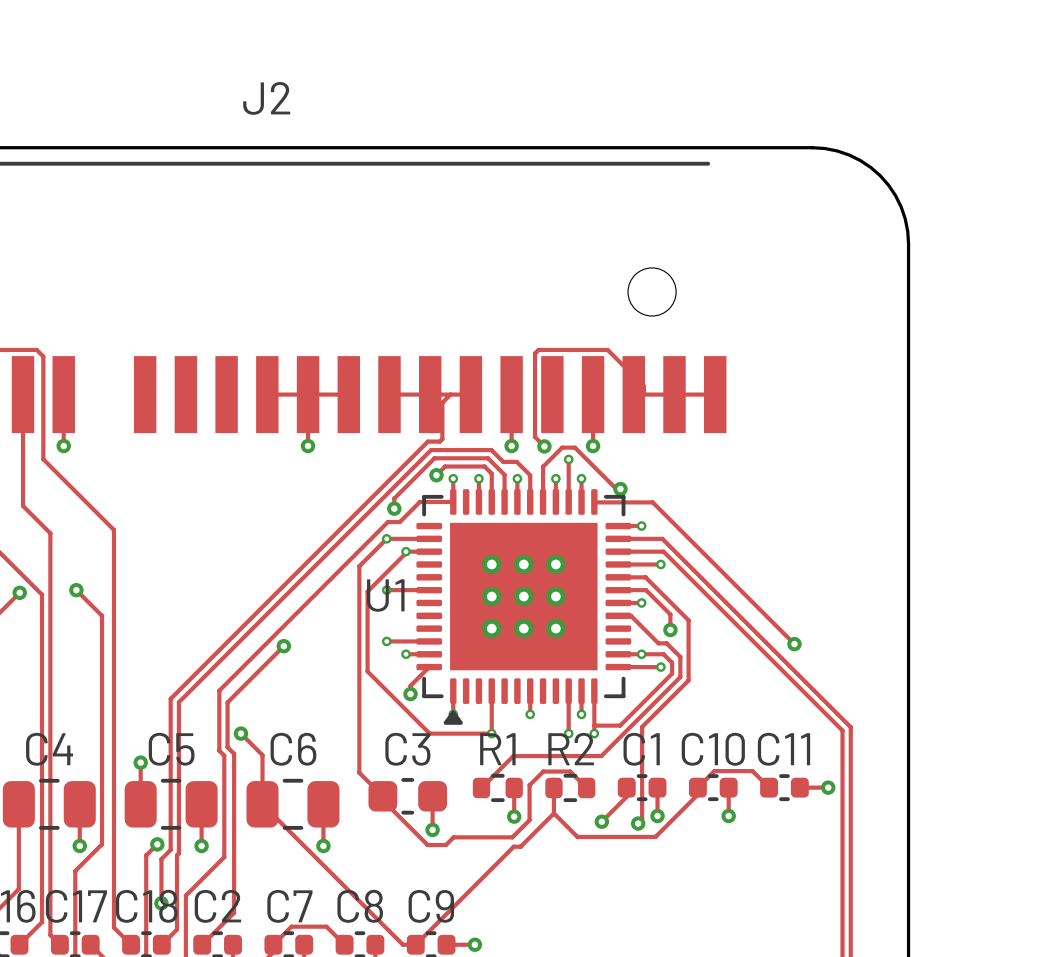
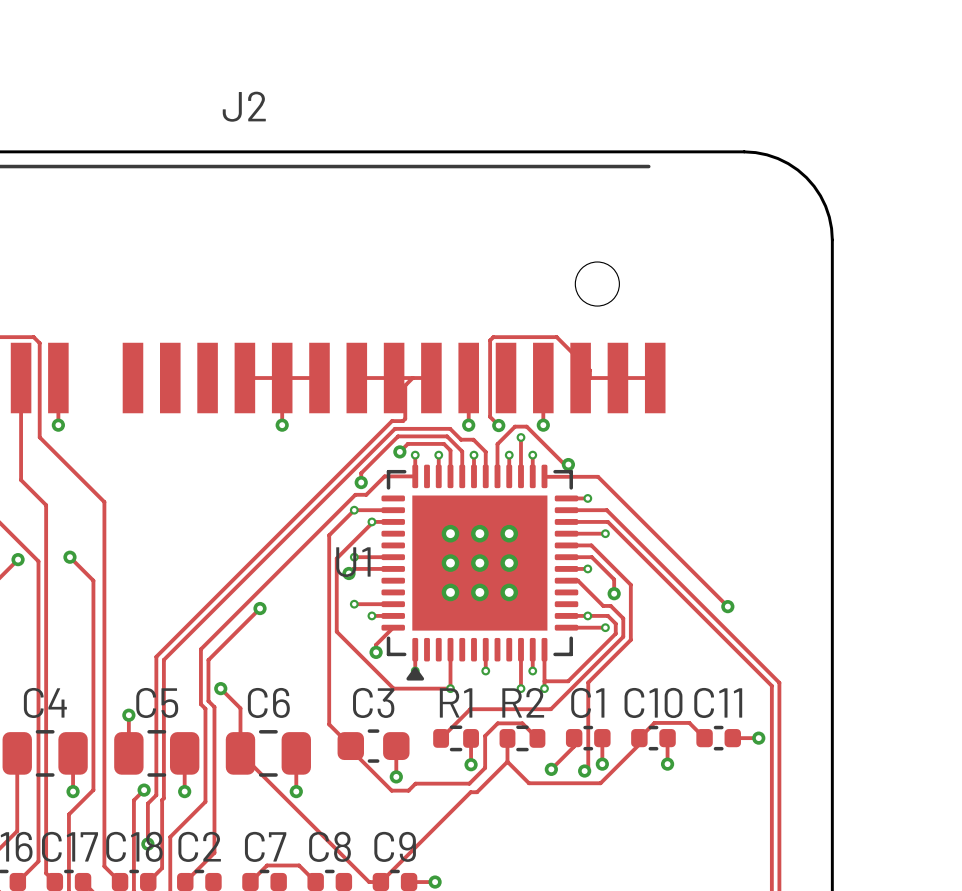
track: none -> (393, 568) (353, 568) (348, 573)
via: none -> (348, 573)

